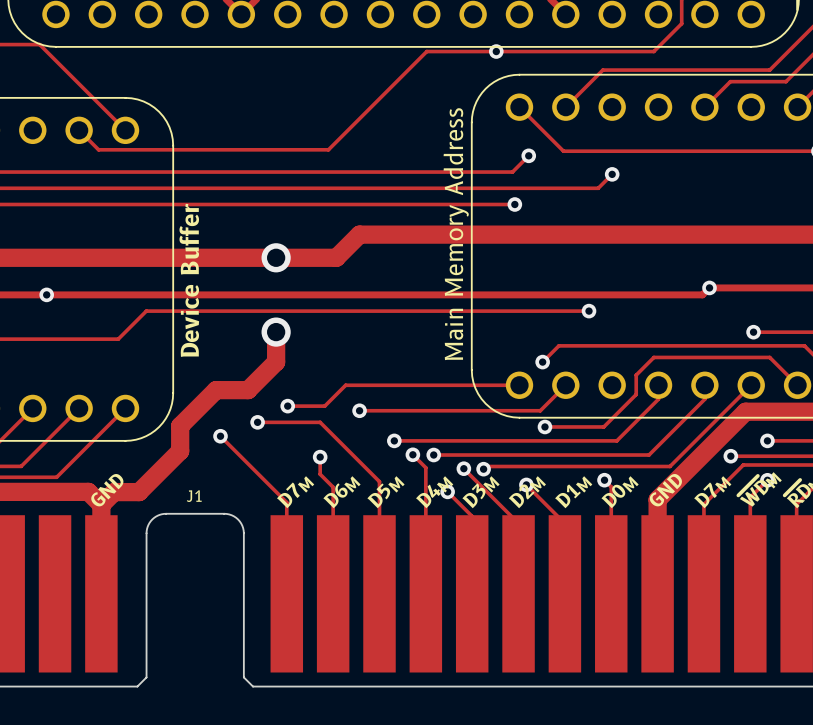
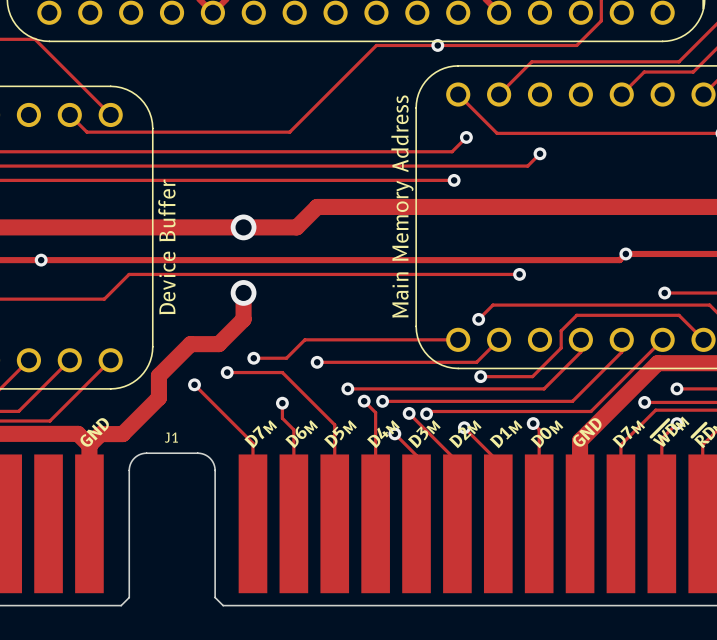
part text: none -> Device Buffer (166, 246)
part text: Device Buffer (189, 280) -> none

